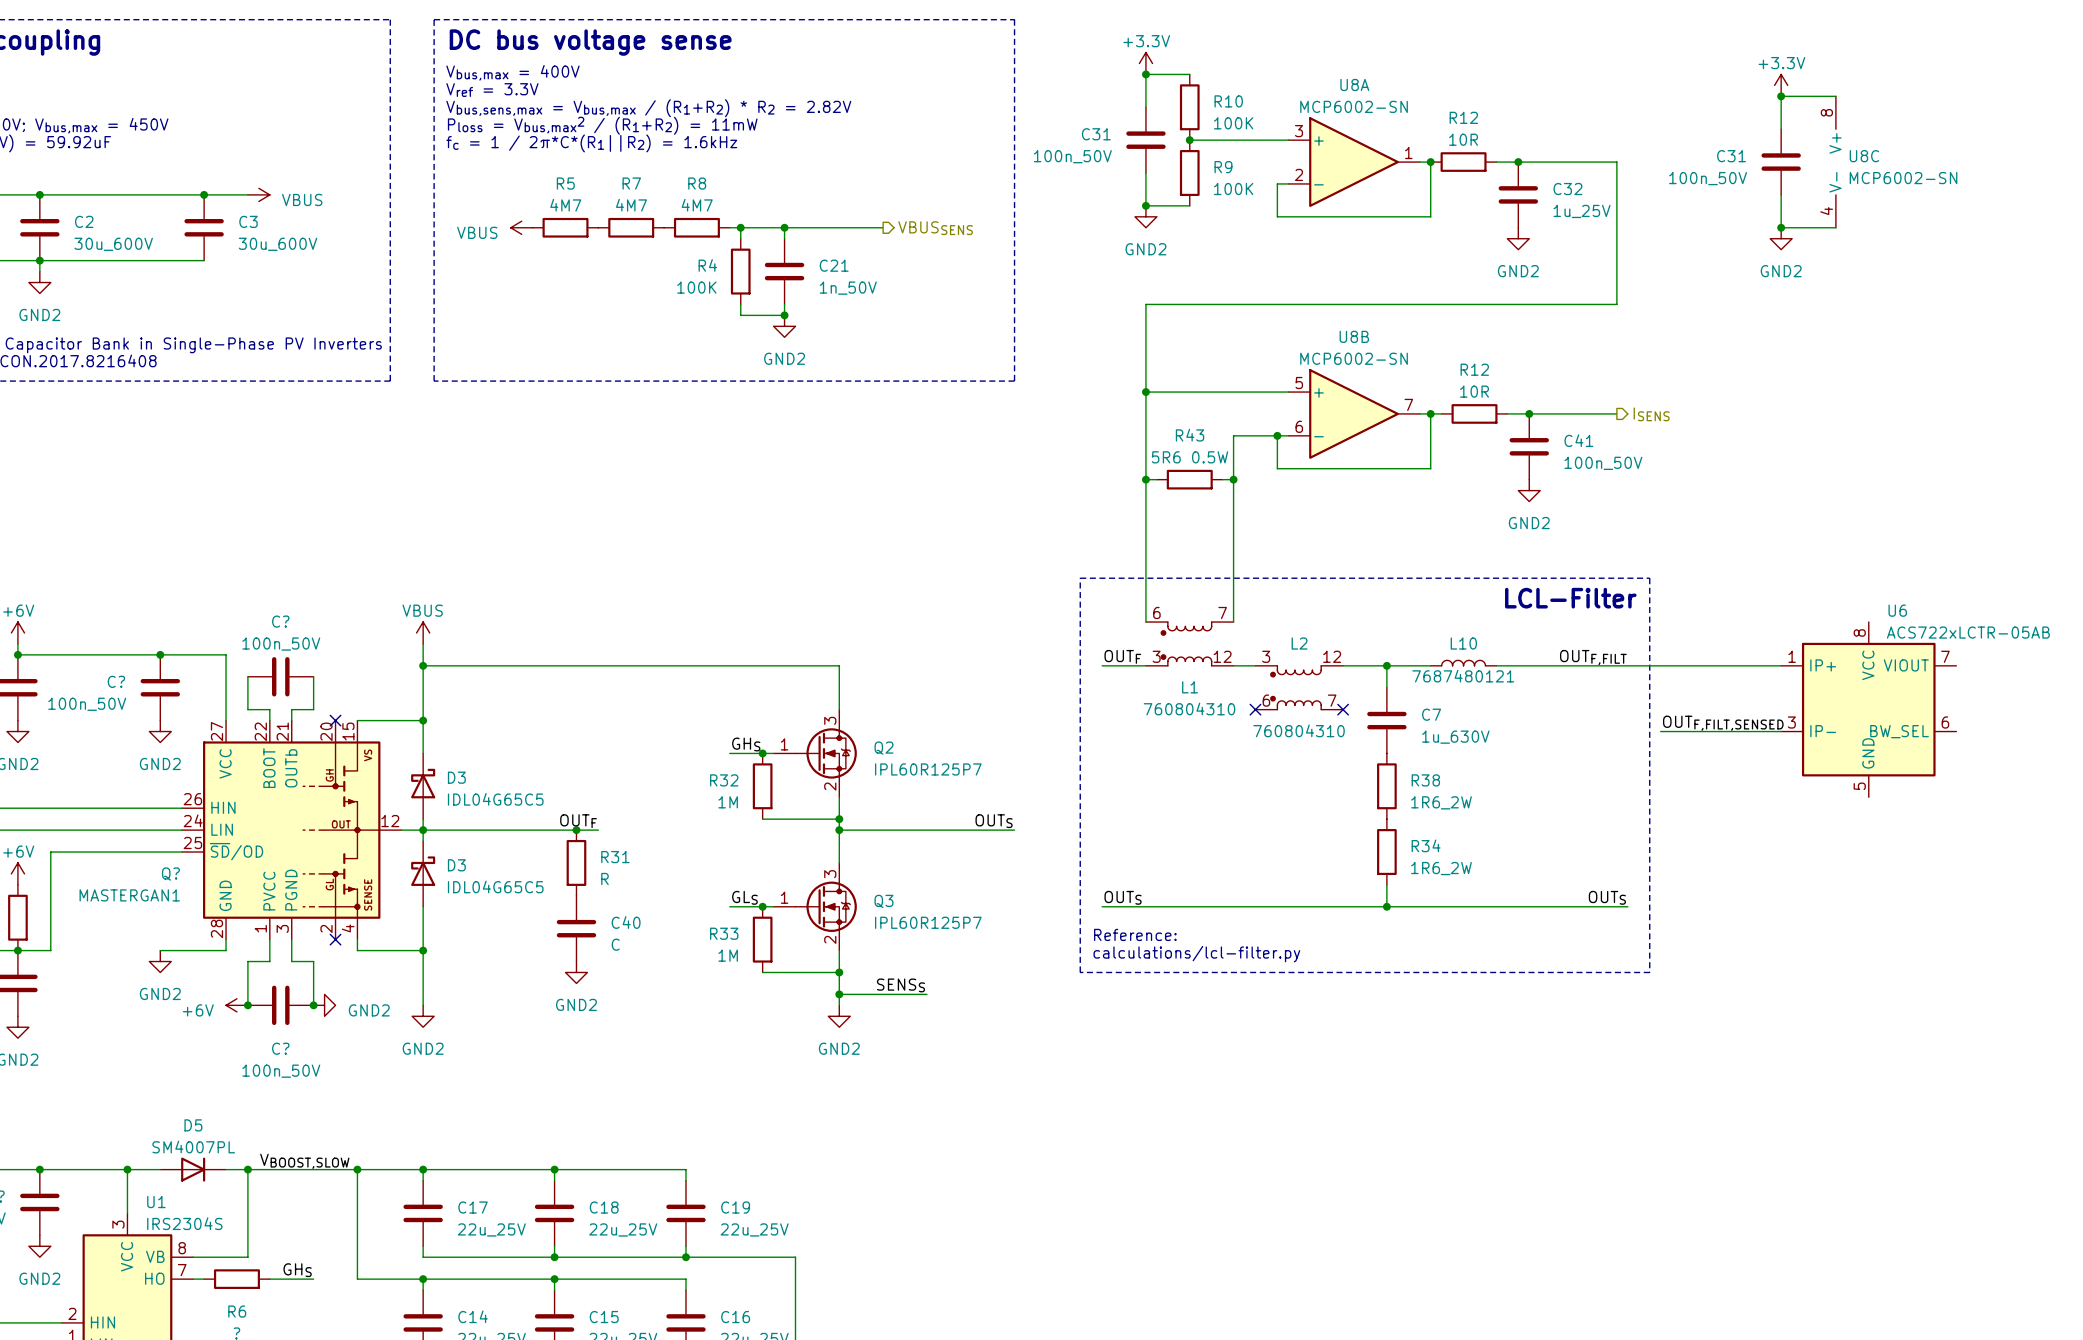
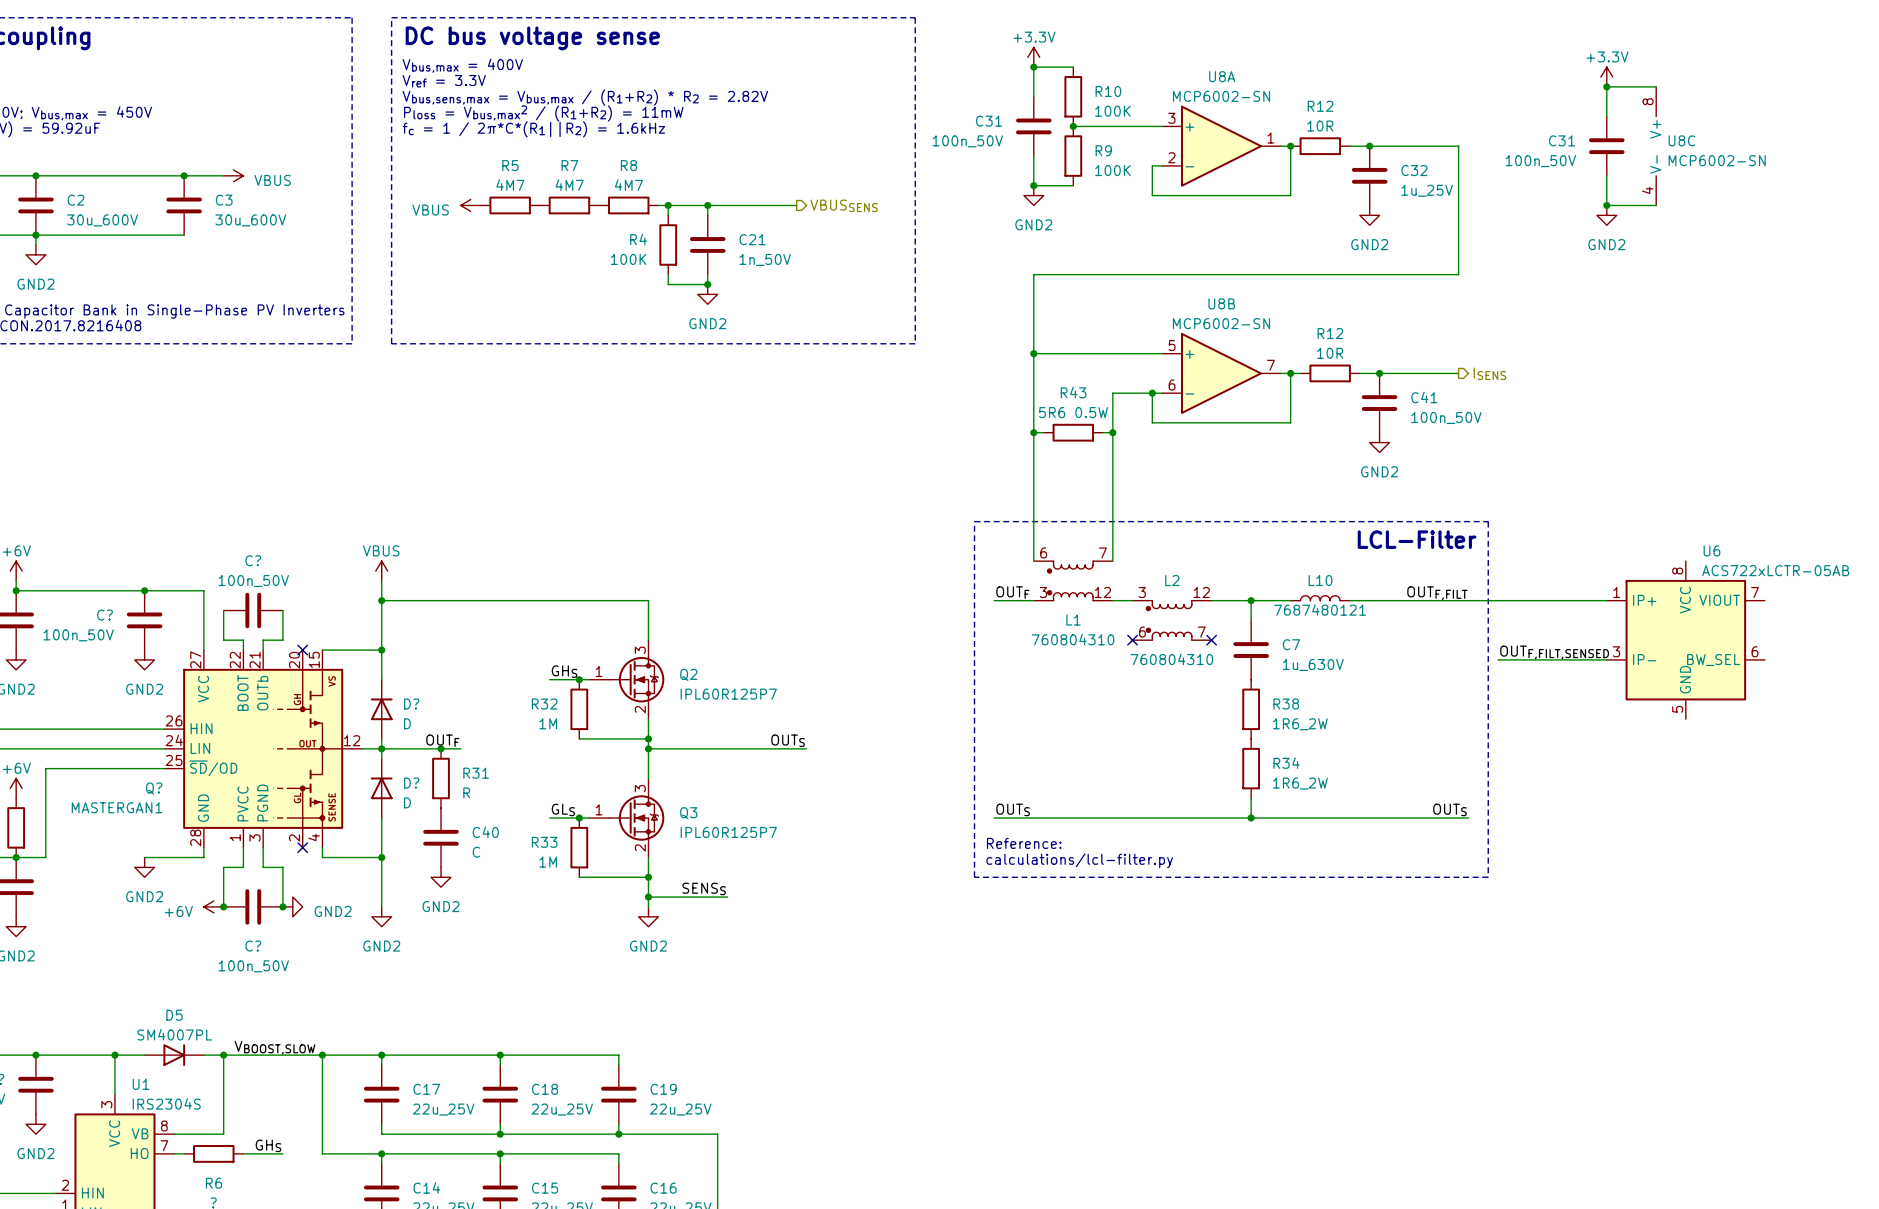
wire: (718, 665) (839, 665) (839, 709) -> (648, 600) (648, 640)
label position: GHS (746, 744) -> GHS (564, 671)
junction: none -> (579, 679)
wire: (729, 753) (773, 753) -> (549, 679) (589, 679)
junction: (762, 753) -> none
Q2 position: (815, 753) -> (626, 679)
D3: IDL04G65C5 (423, 786) -> none
D?: none -> D (381, 709)
R32 position: (762, 786) -> (579, 709)
wire: (839, 797) (839, 862) -> (648, 719) (648, 778)
junction: none -> (648, 738)
wire: (762, 819) (839, 819) -> (579, 738) (648, 738)
junction: (839, 819) -> none
label position: OUTF (578, 821) -> OUTF (442, 740)
label position: OUTS (994, 821) -> OUTS (788, 740)
junction: none -> (441, 748)
wire: (510, 830) (598, 830) -> none
junction: (576, 830) -> none
junction: none -> (648, 748)
junction: (839, 830) -> none
wire: (894, 830) (1014, 830) -> (648, 748) (757, 748)
R31 position: (576, 862) -> (441, 778)
D3: IDL04G65C5 (423, 873) -> none
D?: none -> D (381, 788)
label position: GLS (744, 897) -> GLS (563, 809)
junction: none -> (579, 818)
wire: (729, 906) (773, 906) -> (549, 818) (589, 818)
junction: (762, 906) -> none
Q3 position: (815, 906) -> (626, 818)
C40 position: (576, 928) -> (441, 837)
R33 position: (762, 939) -> (579, 847)
wire: (839, 950) (839, 1005) -> (648, 857) (648, 906)
power symbol: none -> GND2 (441, 877)
power symbol: GND2 (576, 972) -> none
junction: none -> (648, 877)
wire: (762, 972) (839, 972) -> (579, 877) (648, 877)
junction: (839, 972) -> none
label position: SENSS (900, 985) -> SENSS (704, 888)
junction: none -> (648, 897)
wire: (839, 994) (926, 994) -> (648, 897) (727, 897)
junction: (839, 994) -> none
power symbol: none -> GND2 (648, 916)
power symbol: GND2 (839, 1016) -> none

